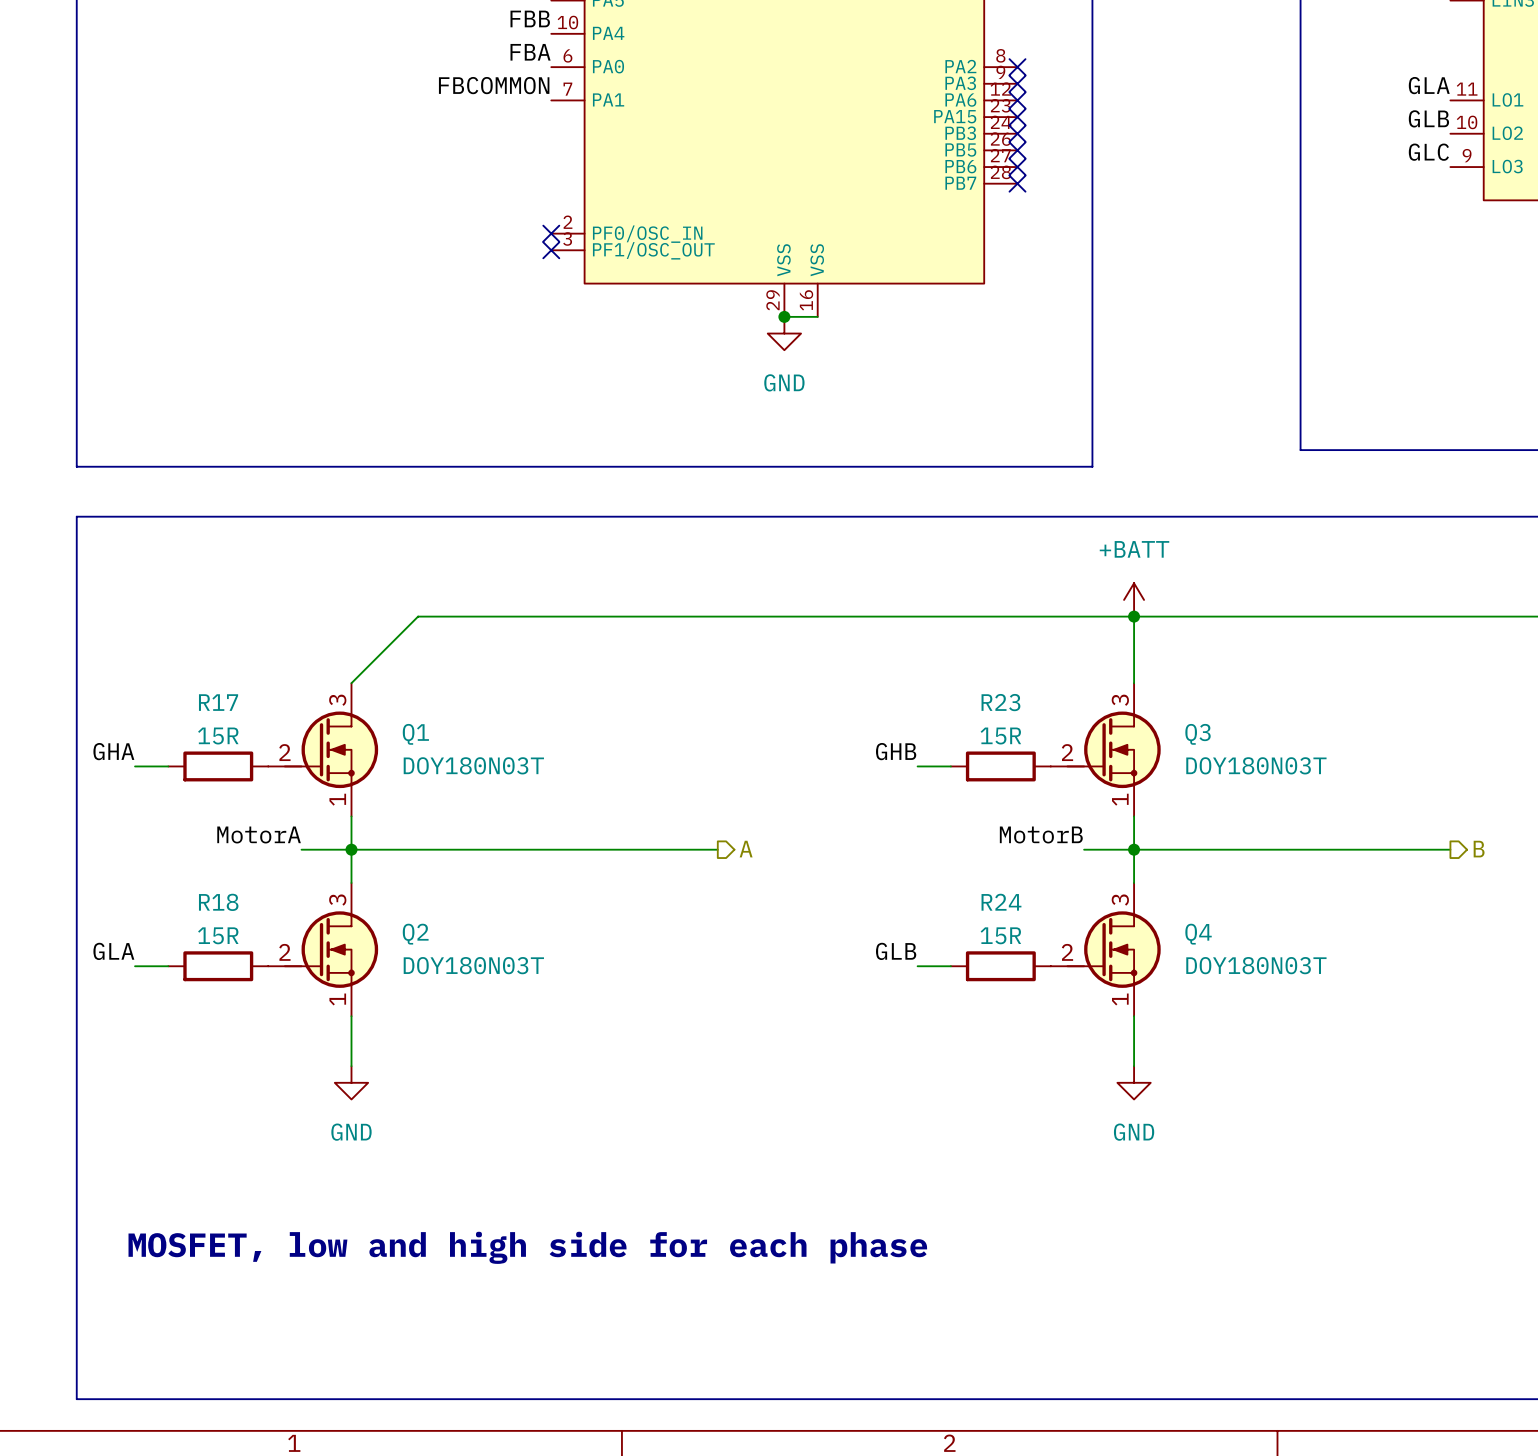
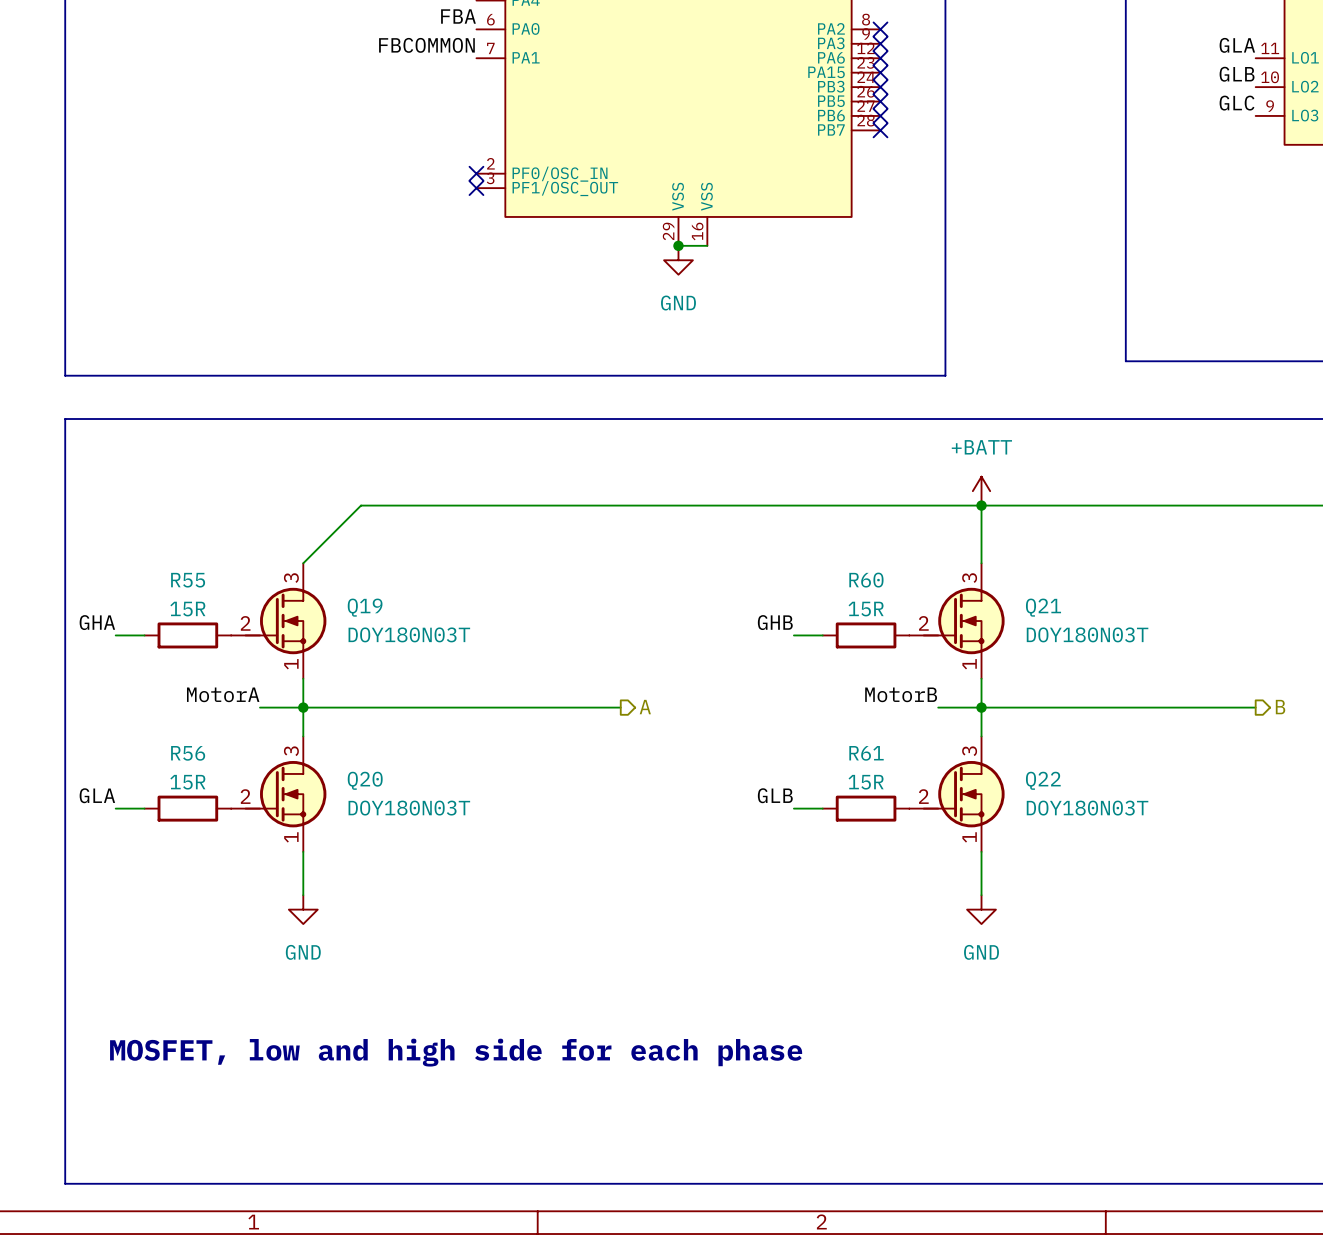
R17 name: R17 (218, 702) -> R55 (188, 580)
R23 name: R23 (1000, 702) -> R60 (866, 580)
Q1 name: Q1 (415, 734) -> Q19 (365, 607)
Q3 name: Q3 (1198, 734) -> Q21 (1043, 607)
R18 name: R18 (218, 902) -> R56 (188, 753)
R24 name: R24 (1001, 902) -> R61 (866, 753)
Q2 name: Q2 (415, 934) -> Q20 (365, 780)
Q4 name: Q4 (1198, 934) -> Q22 (1043, 780)

